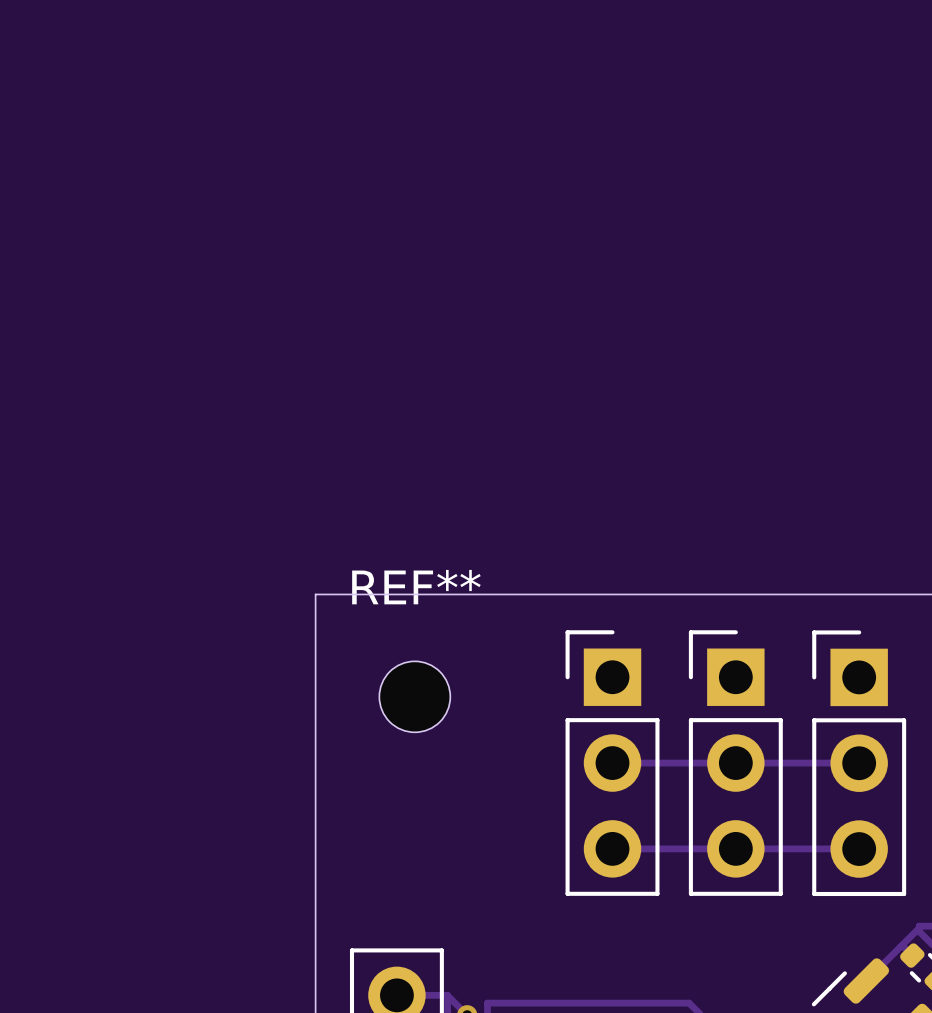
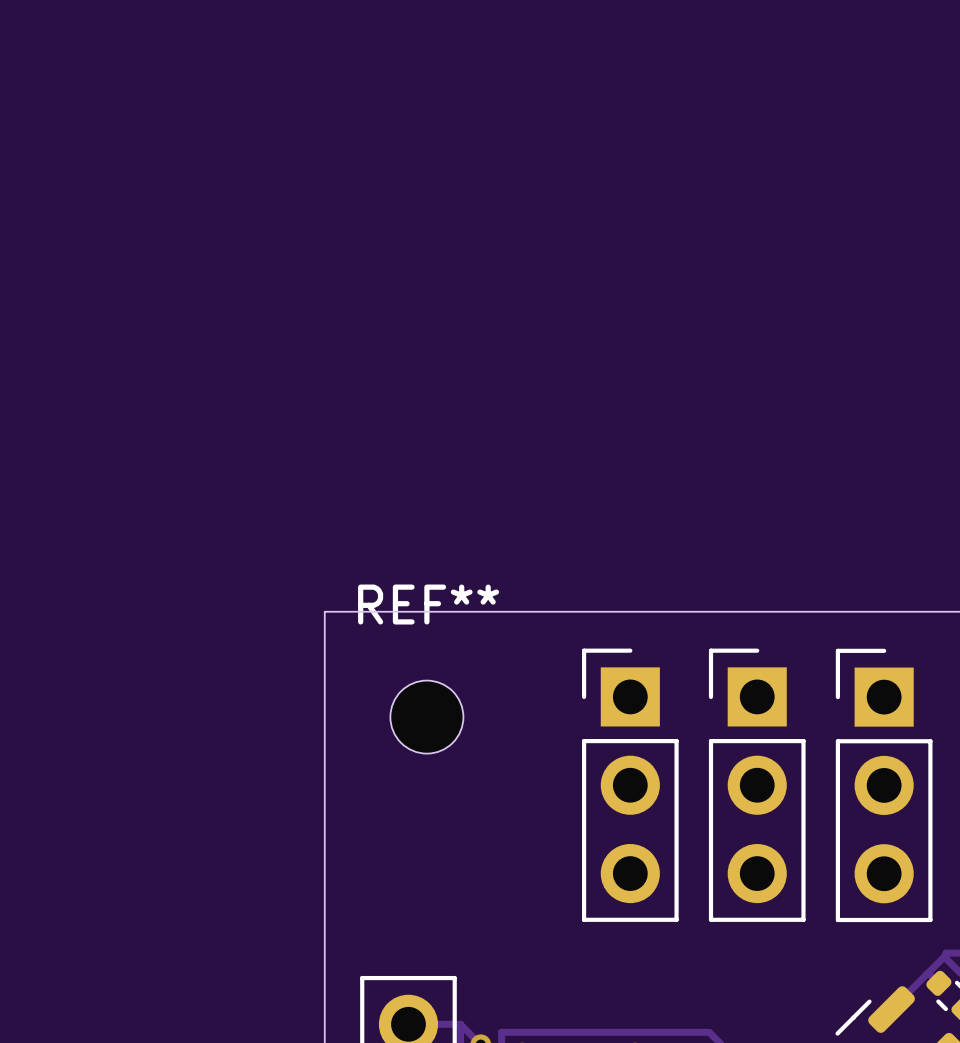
track: (612, 763) (859, 763) -> none
track: (612, 848) (859, 848) -> none

